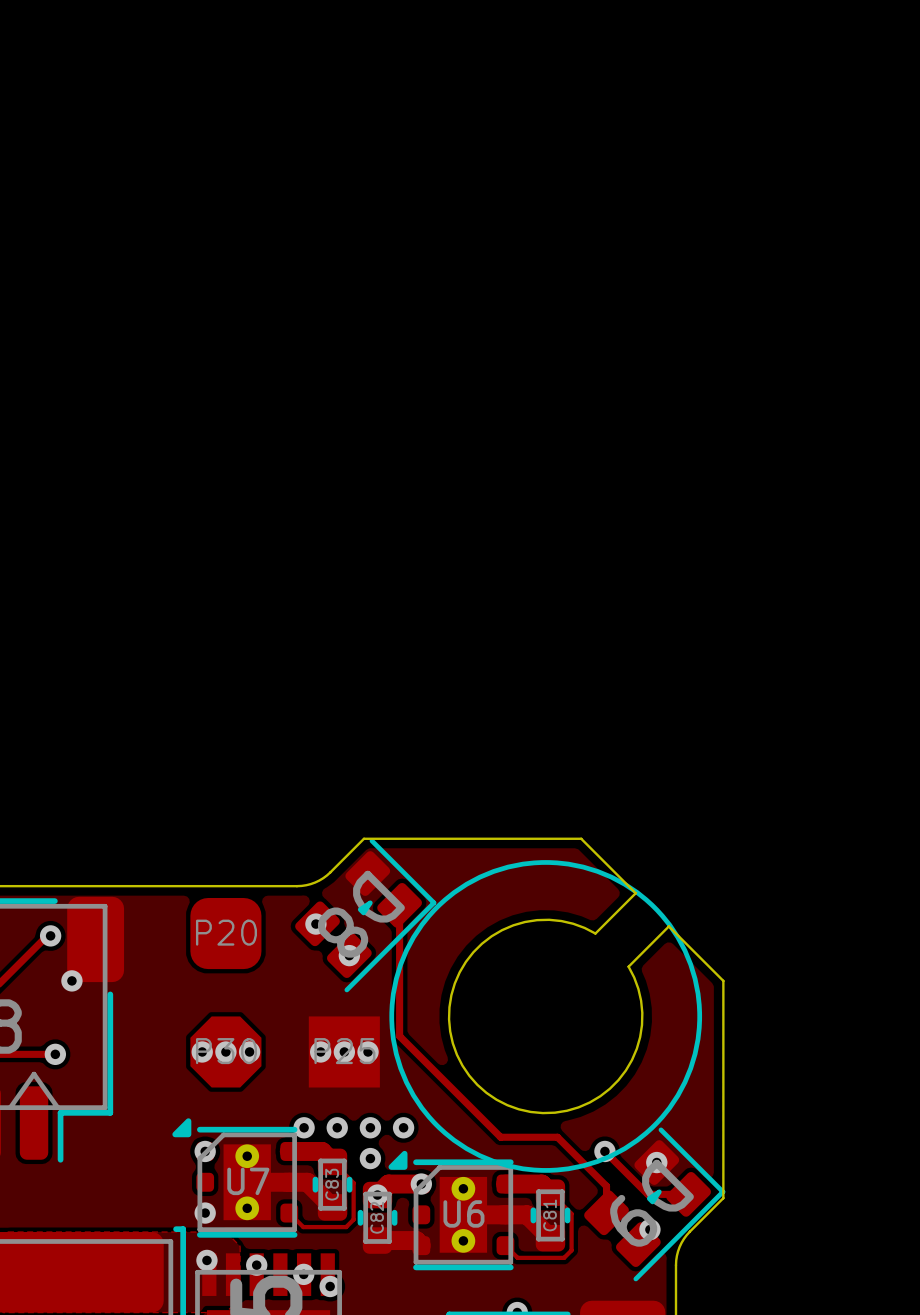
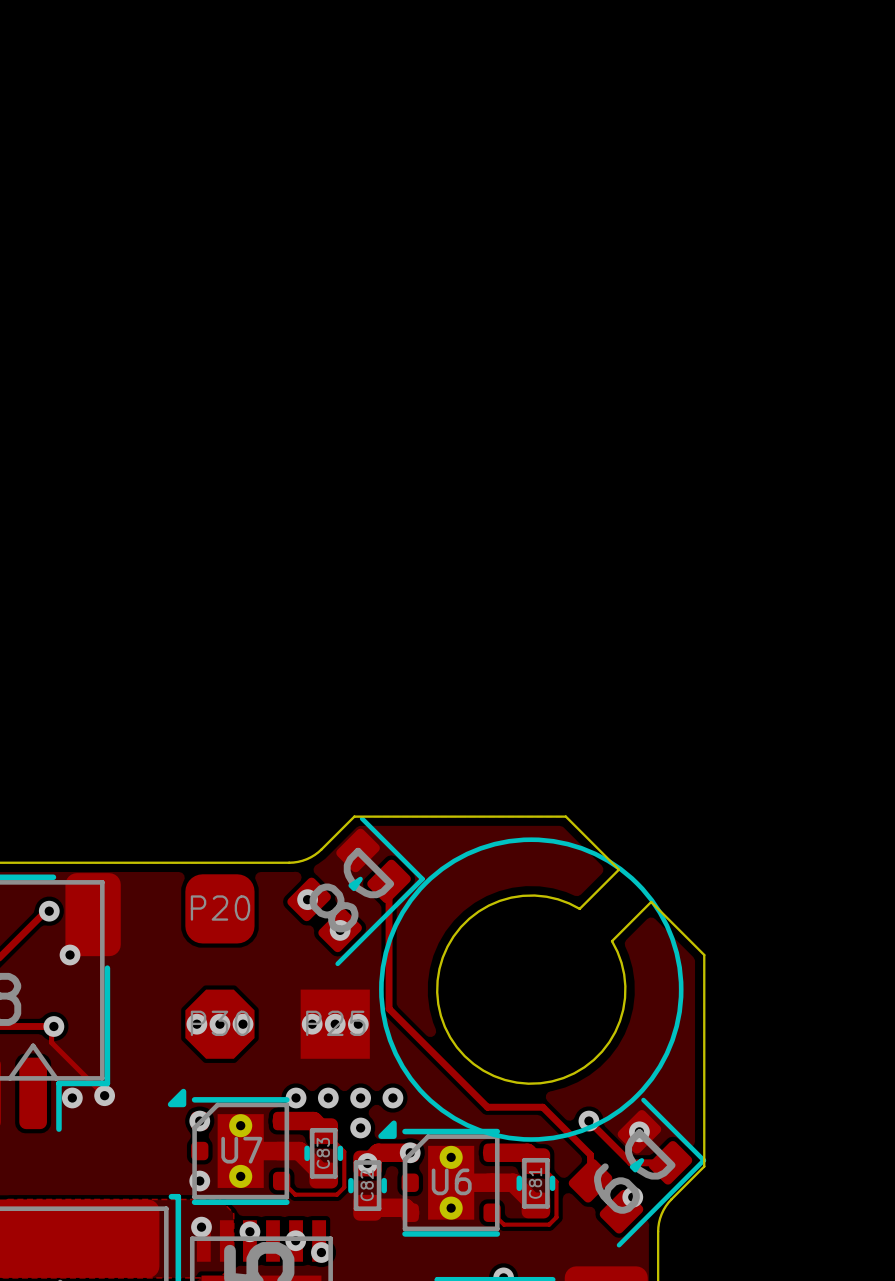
track: none -> (53, 1026) (51, 1028) (51, 1042) (104, 1095)
via: none -> (104, 1095)
via: none -> (72, 1097)

